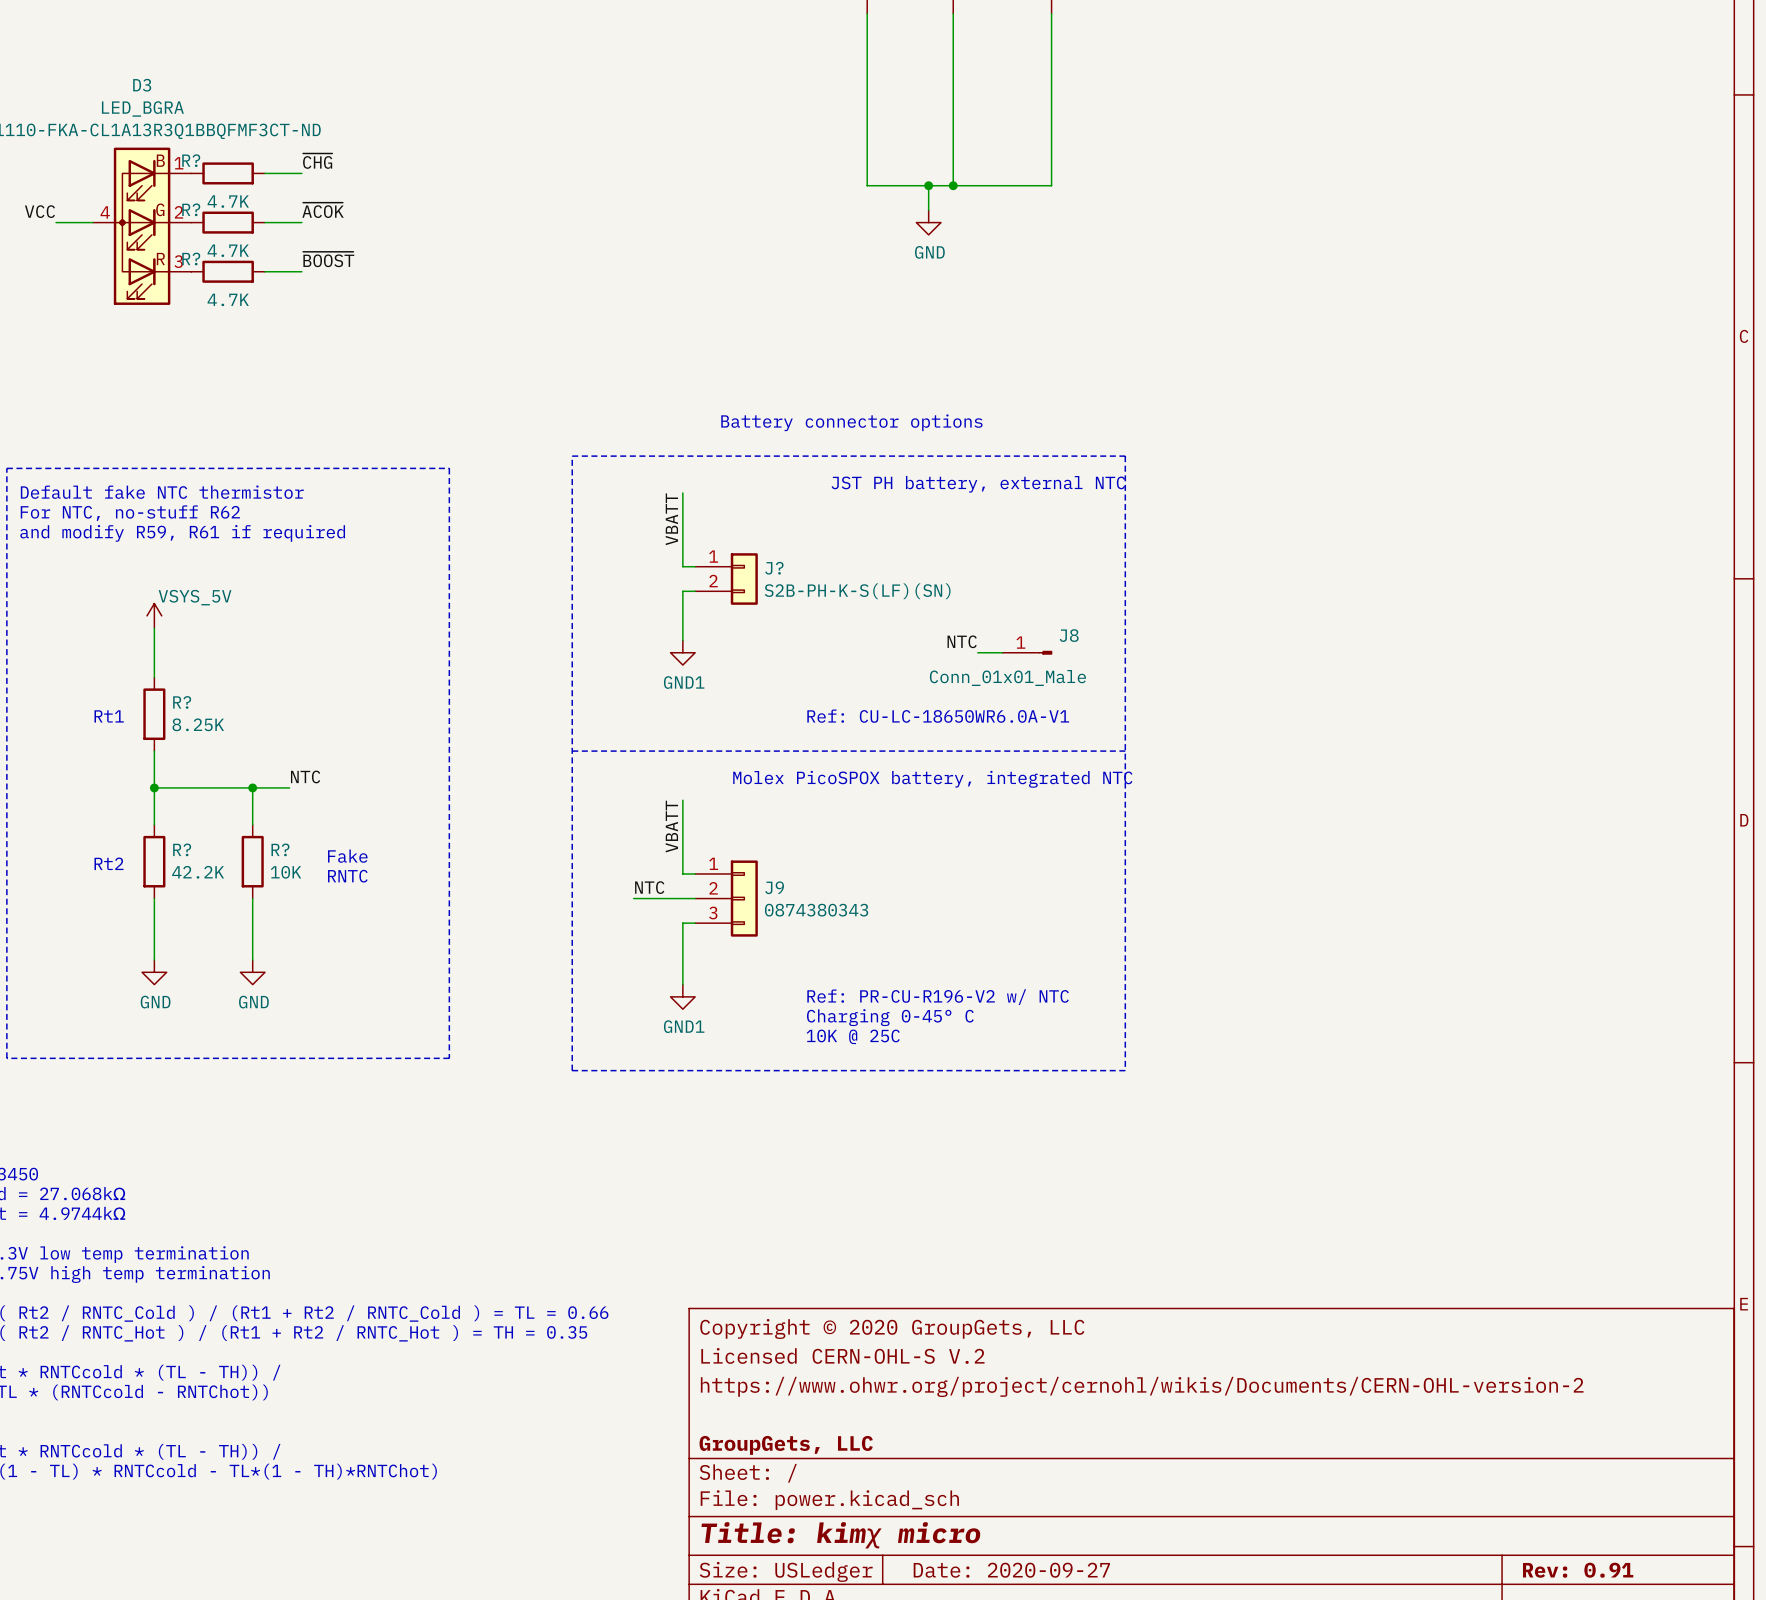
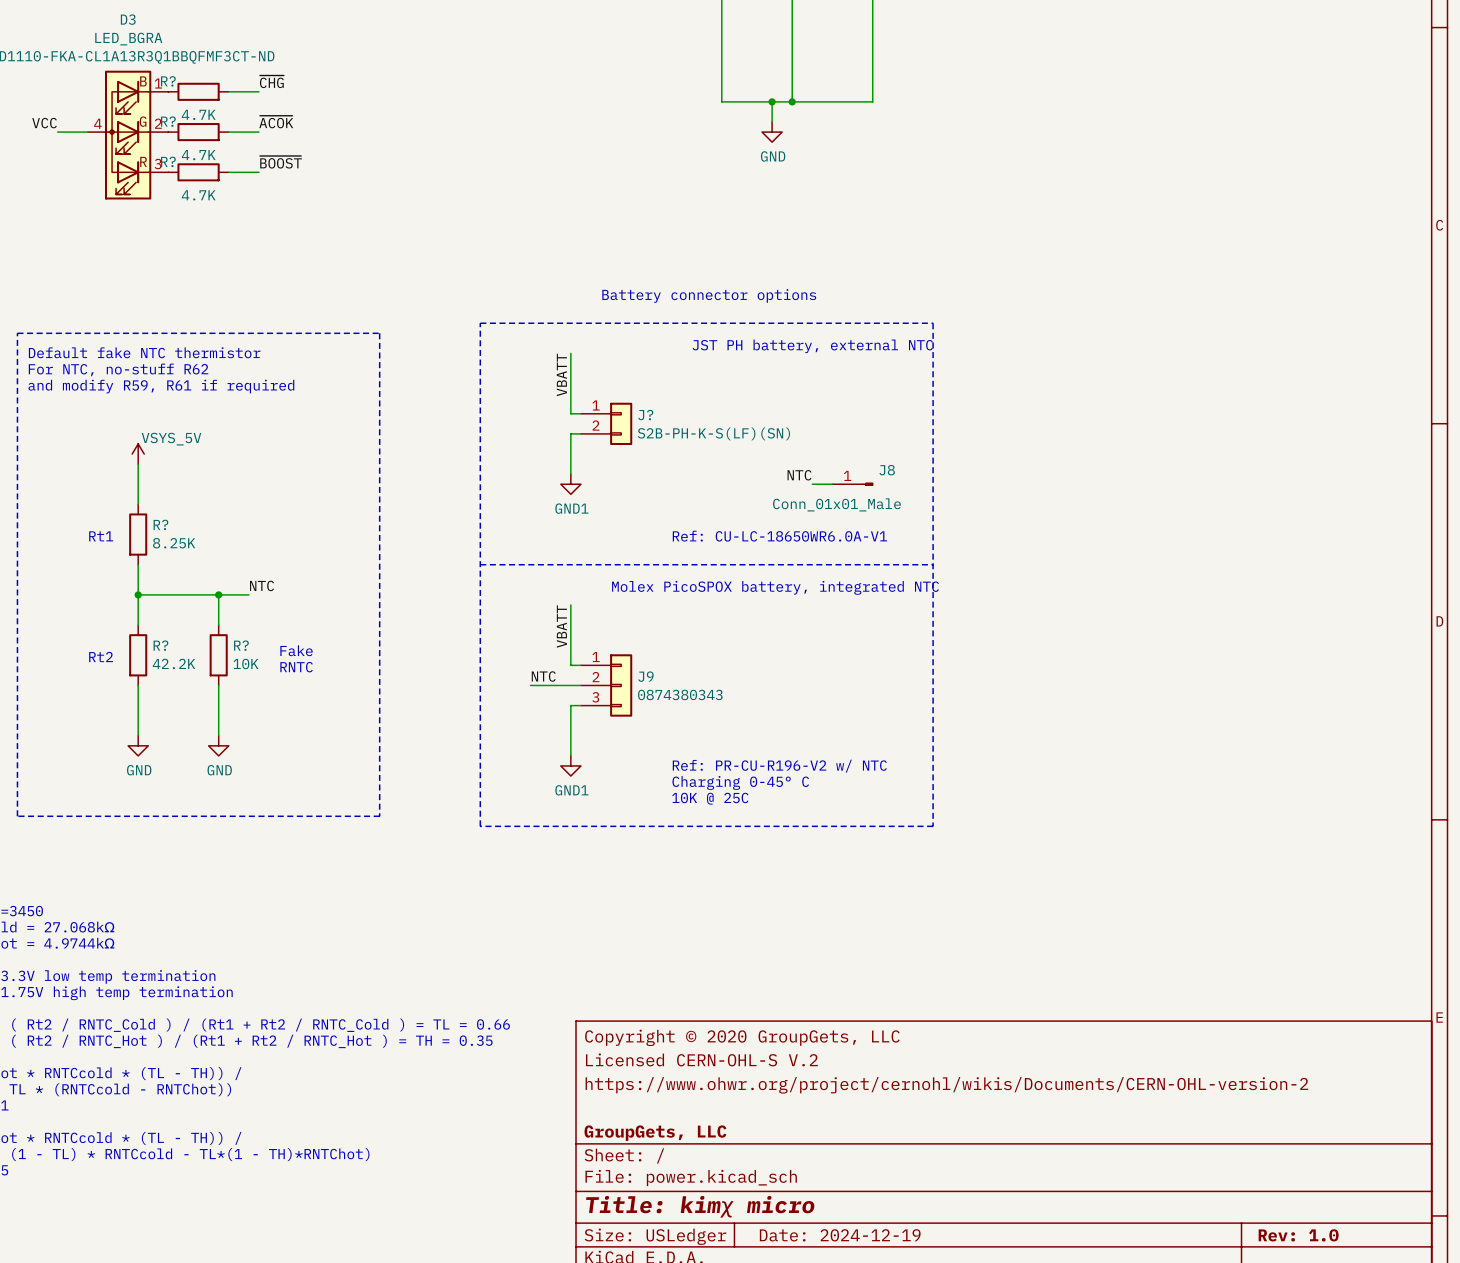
title block: Date: 2020-09-27 (1011, 1570) -> Date: 2024-12-19 (840, 1235)
title block: Rev: 0.91 (1578, 1570) -> Rev: 1.0 (1298, 1235)

